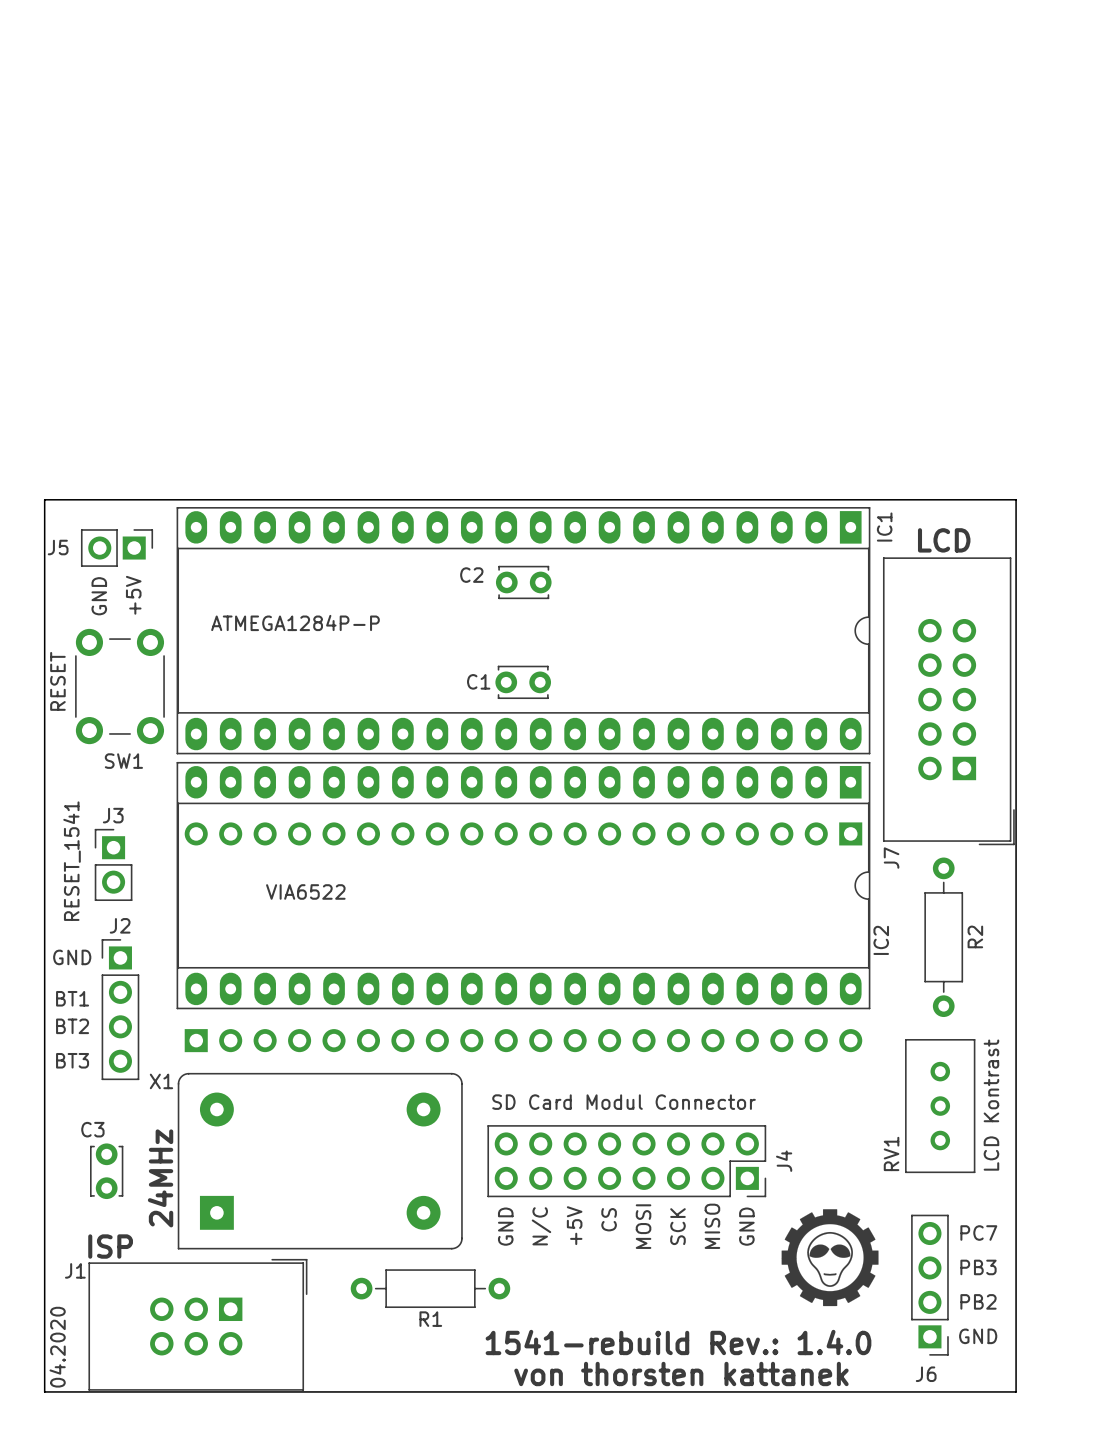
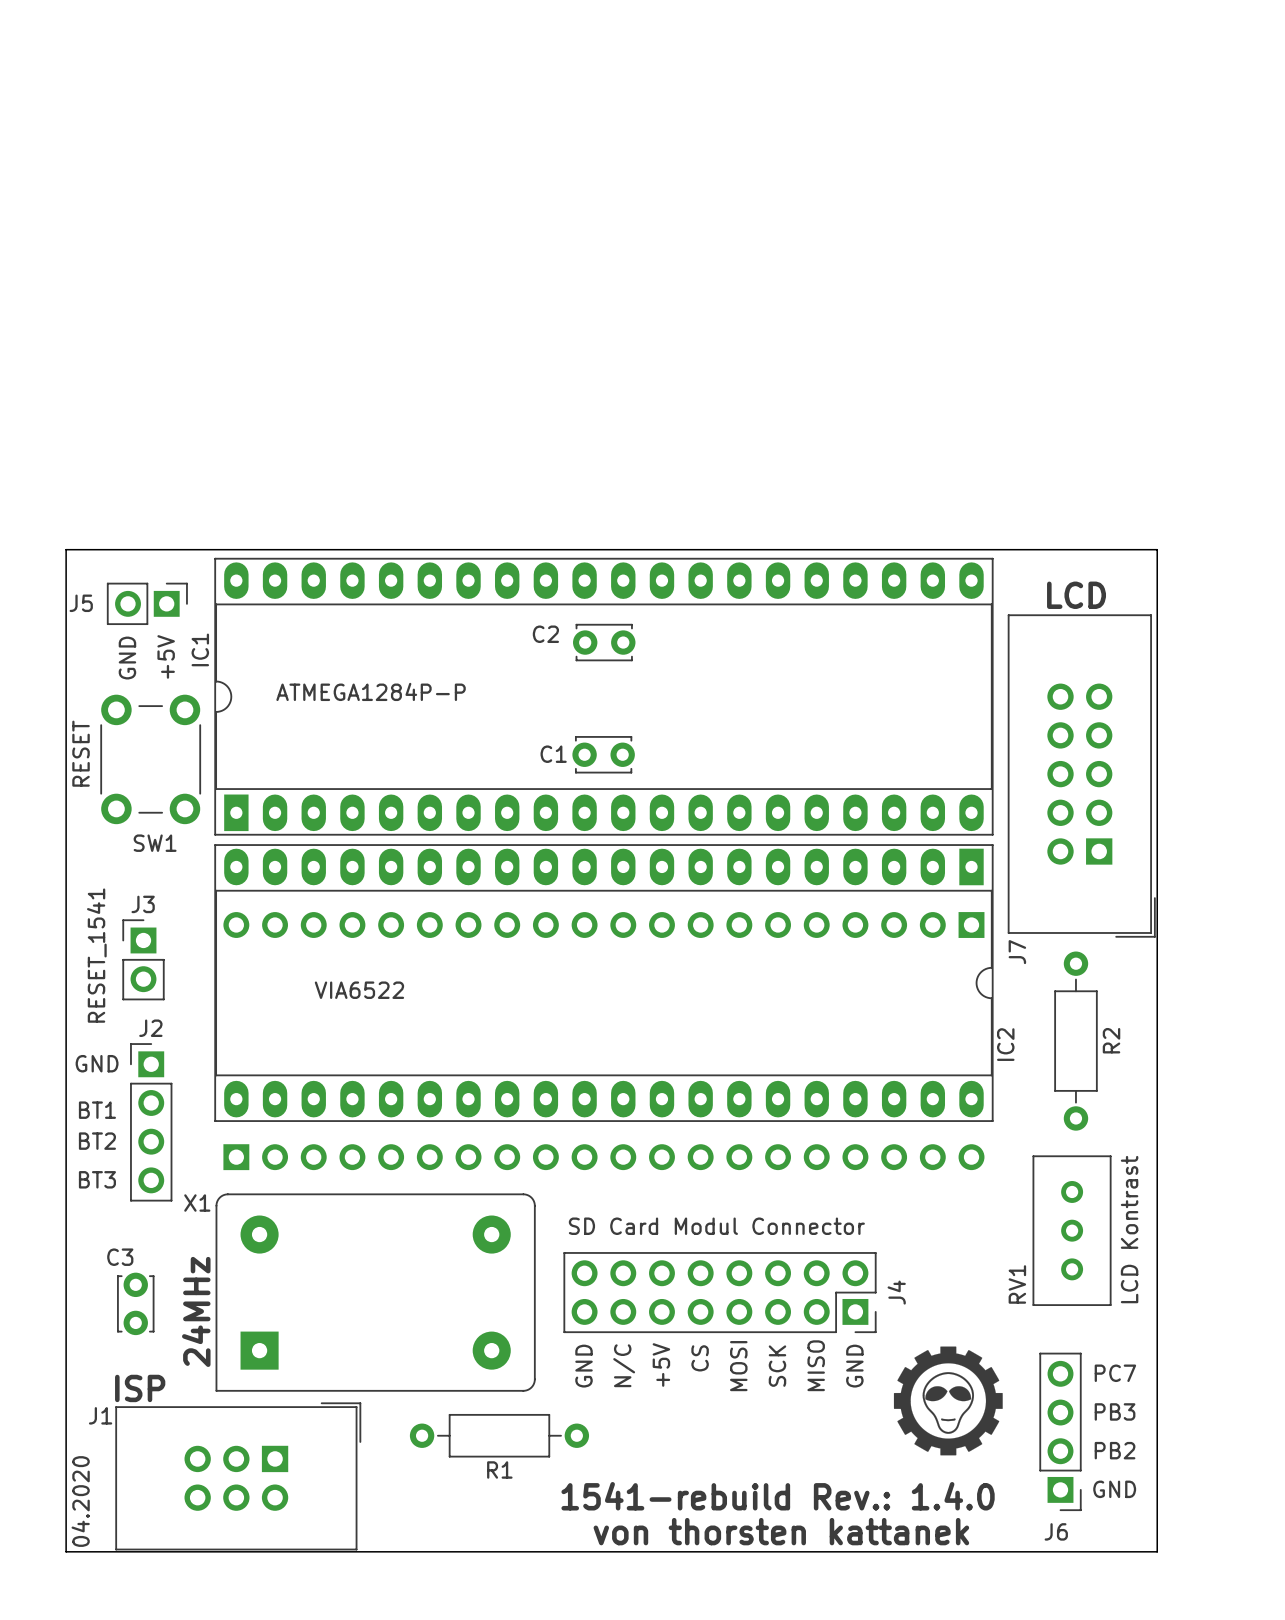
IC1 name position: IC1 (884, 527) -> IC1 (200, 649)
IC1 rotation: 0° (523, 630) -> 180° (603, 696)

